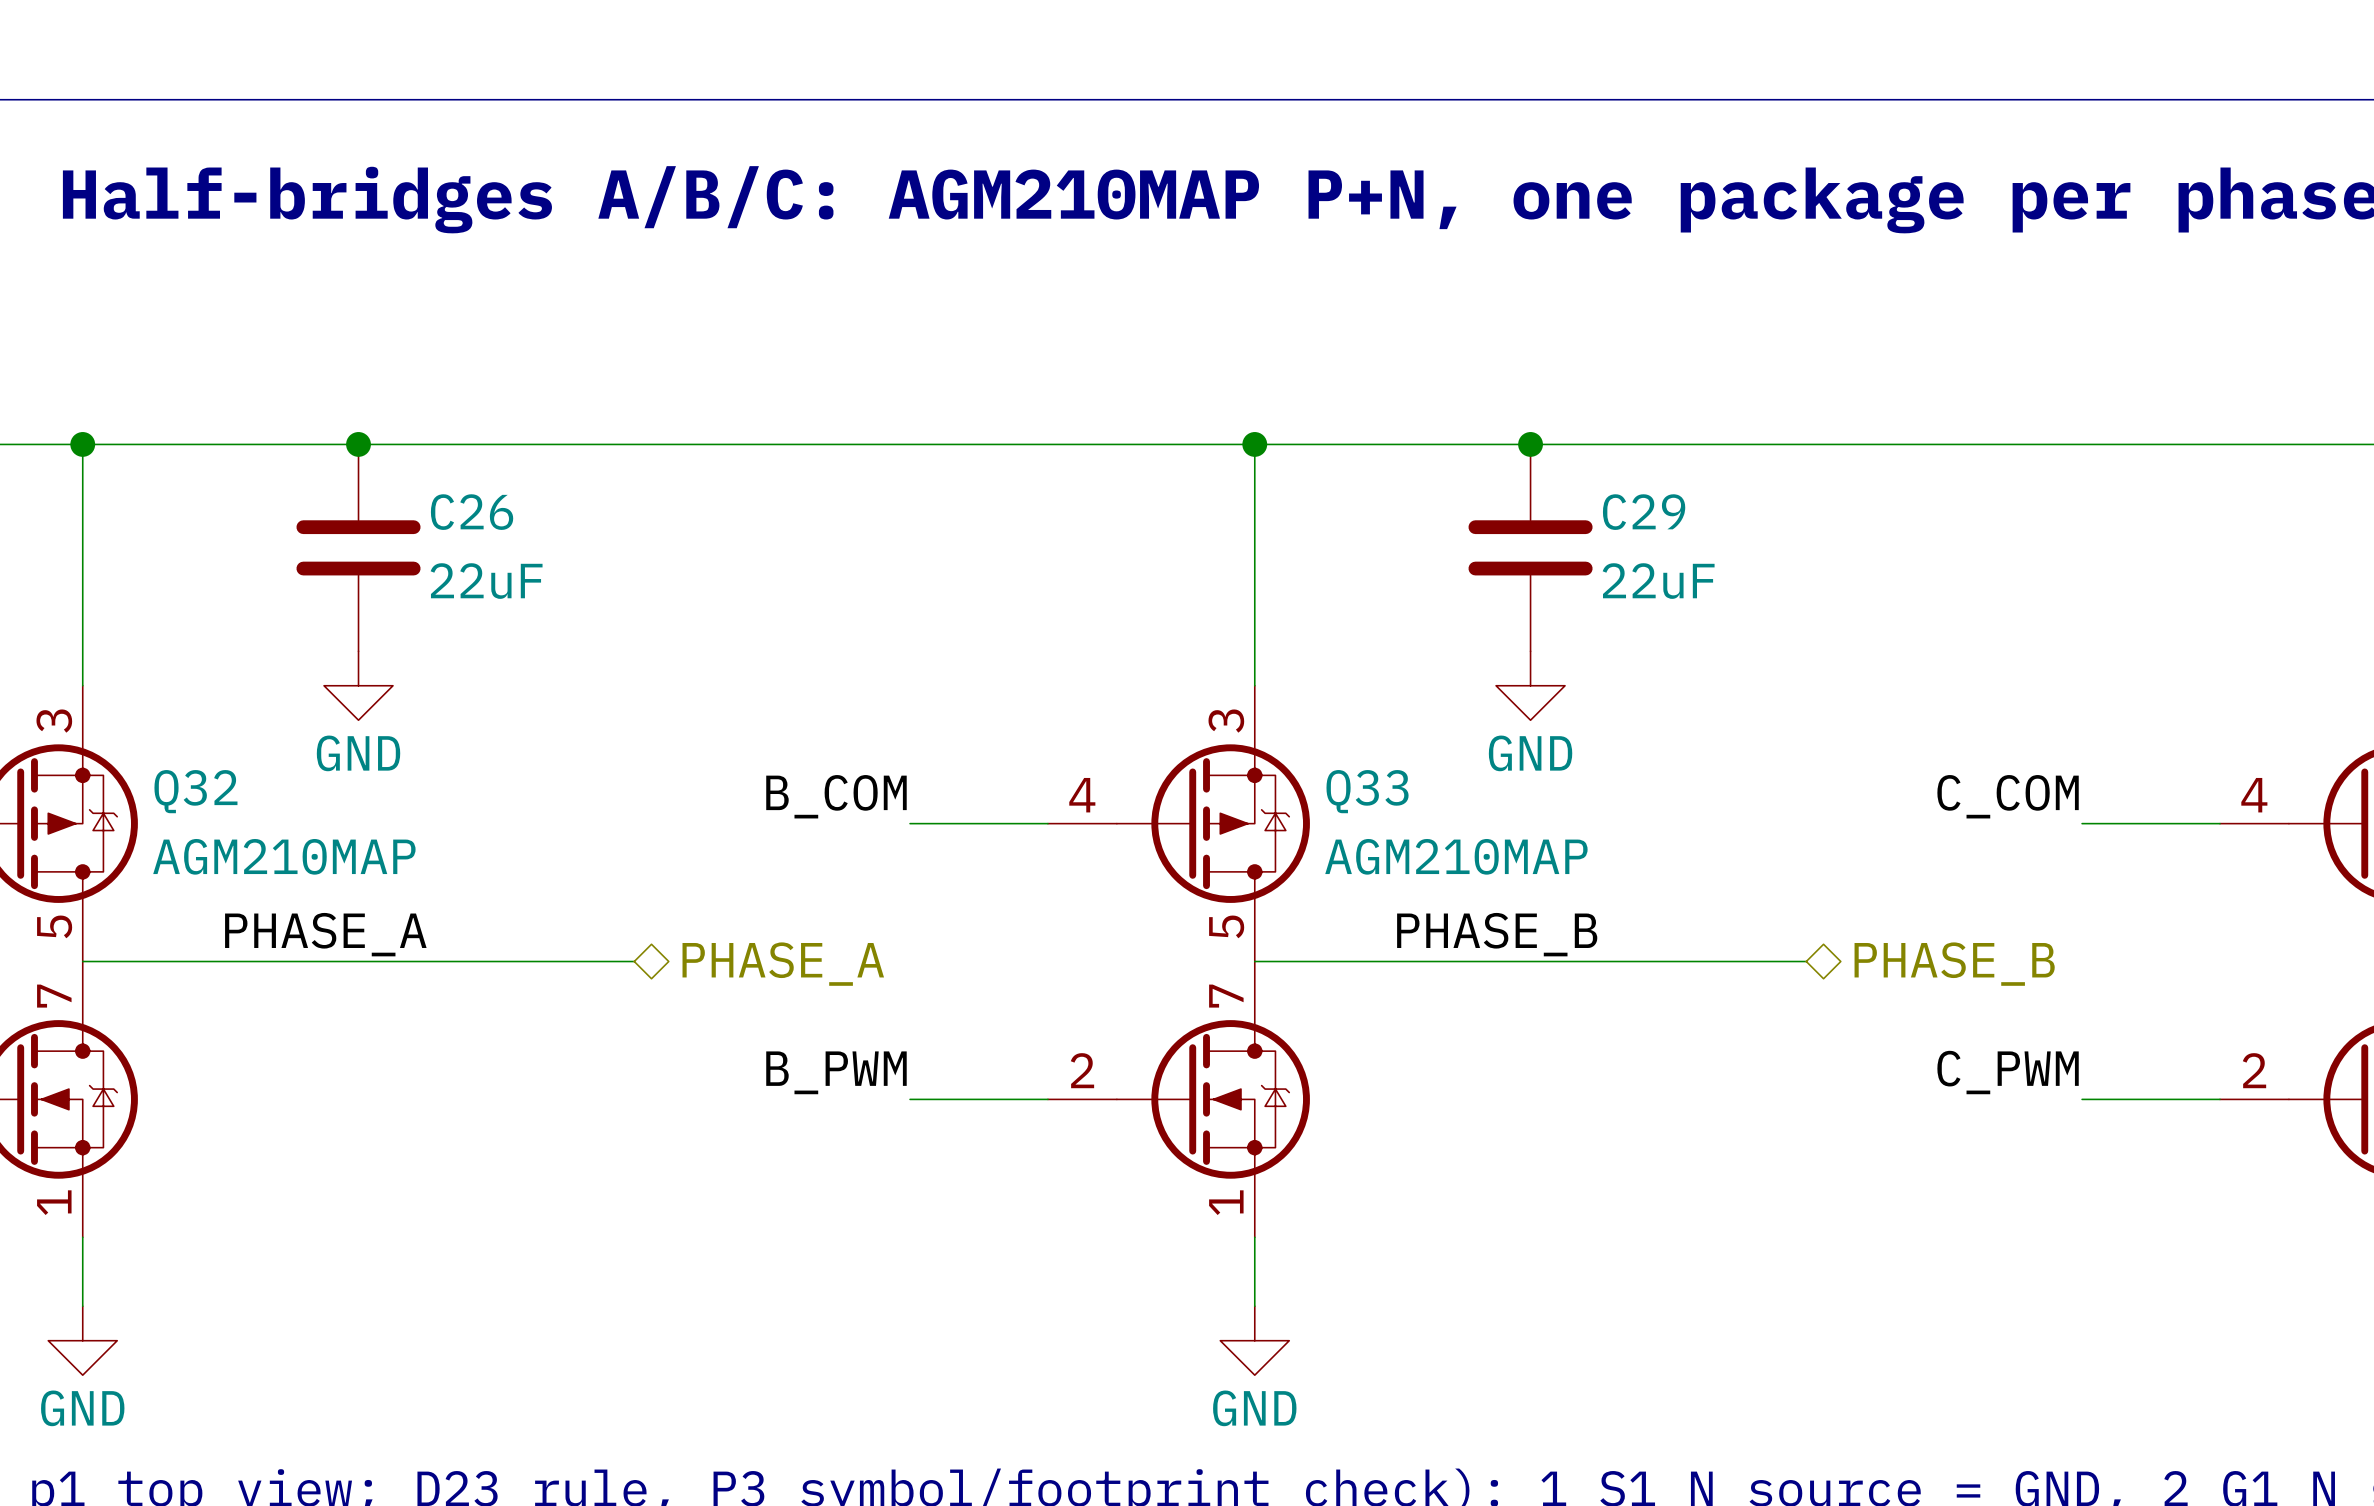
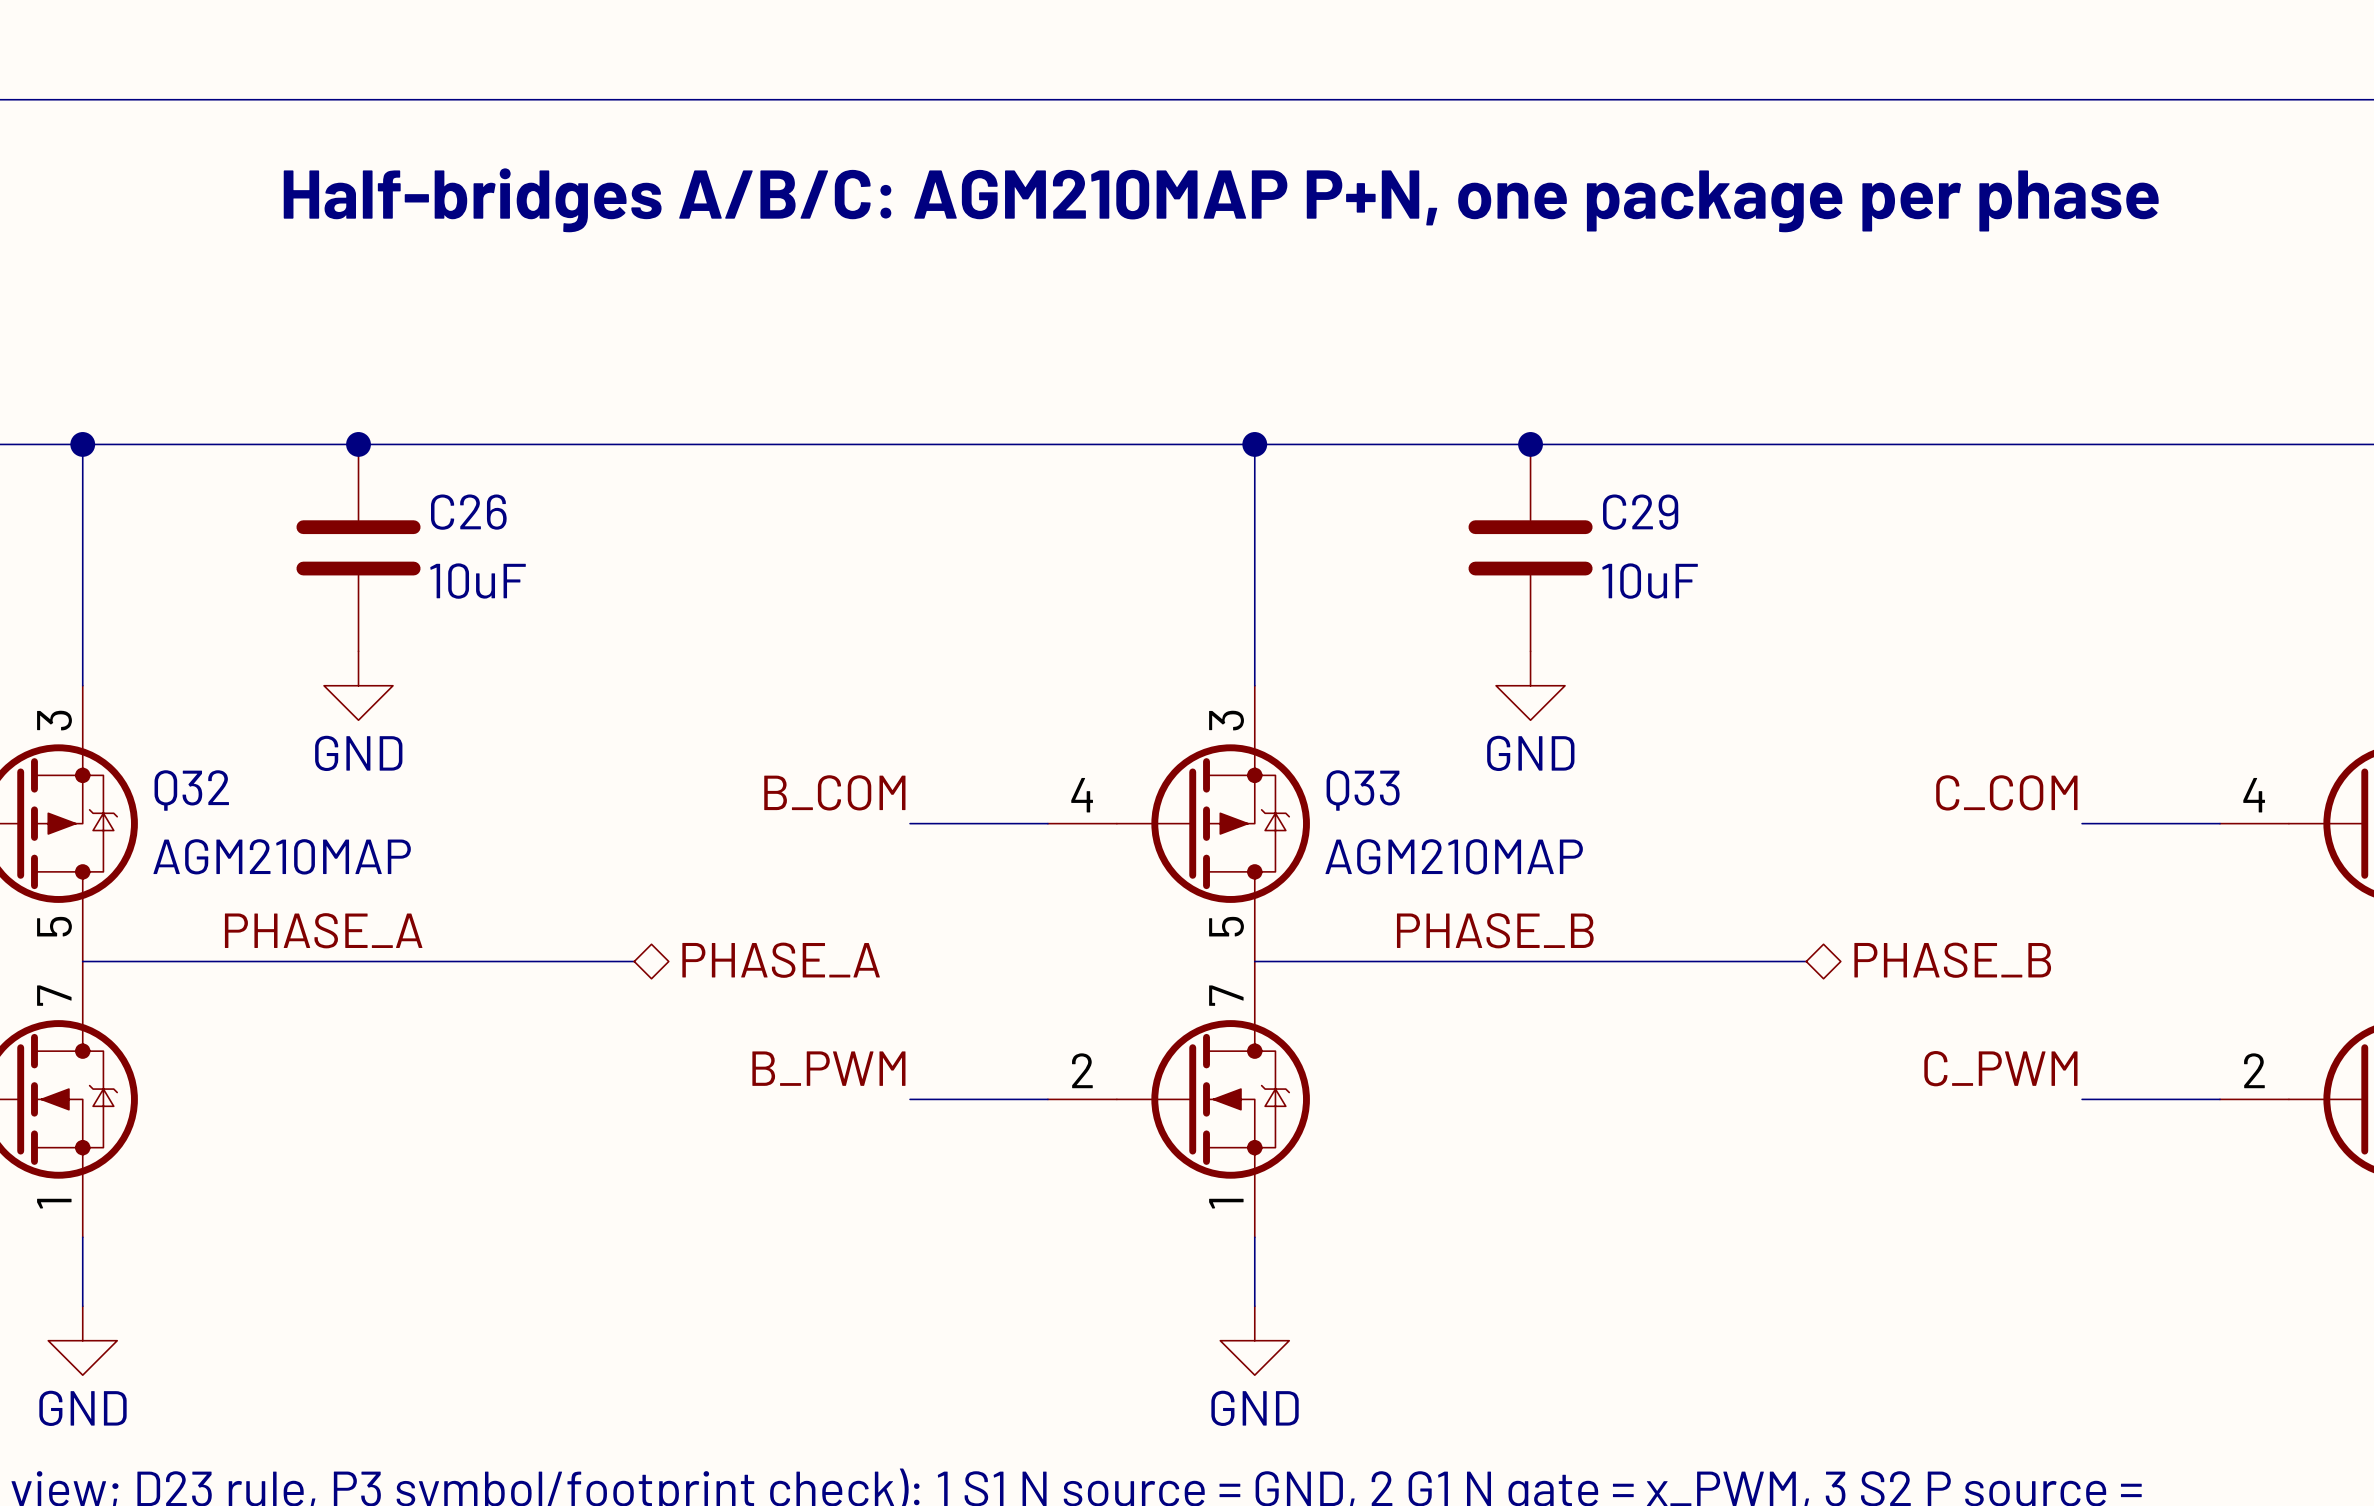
C26 value: 22uF (486, 581) -> 10uF (478, 581)
C29 value: 22uF (1658, 581) -> 10uF (1650, 581)

